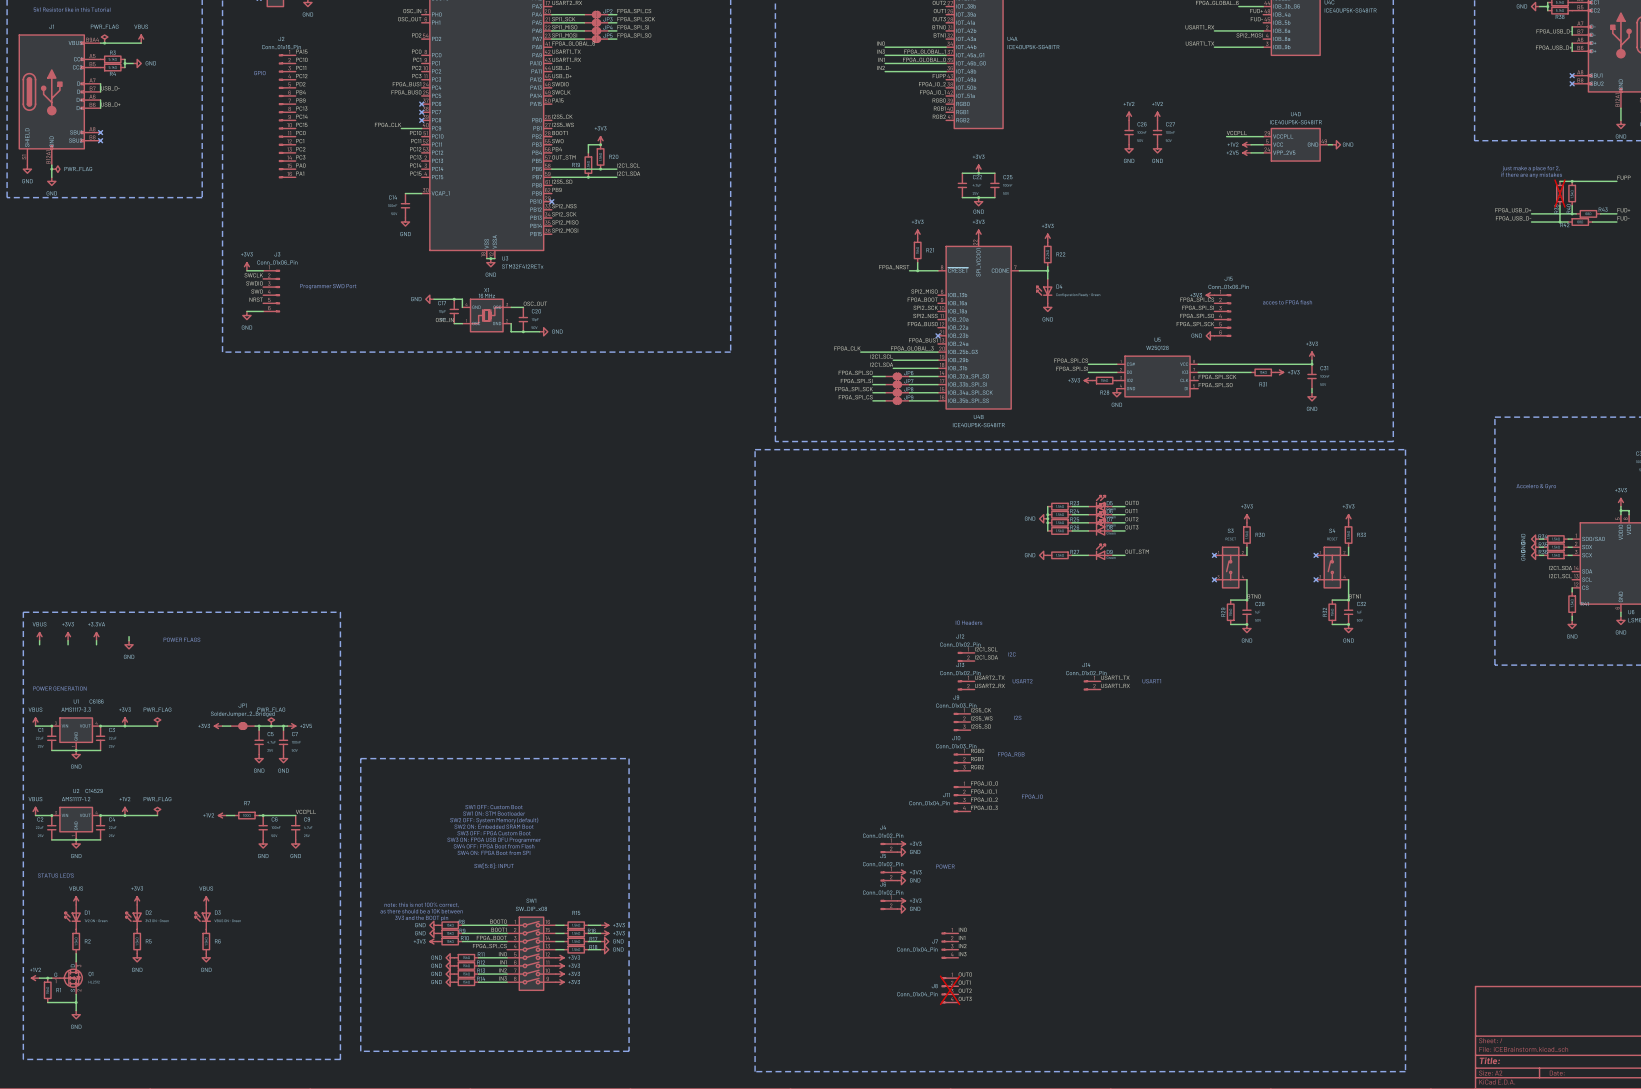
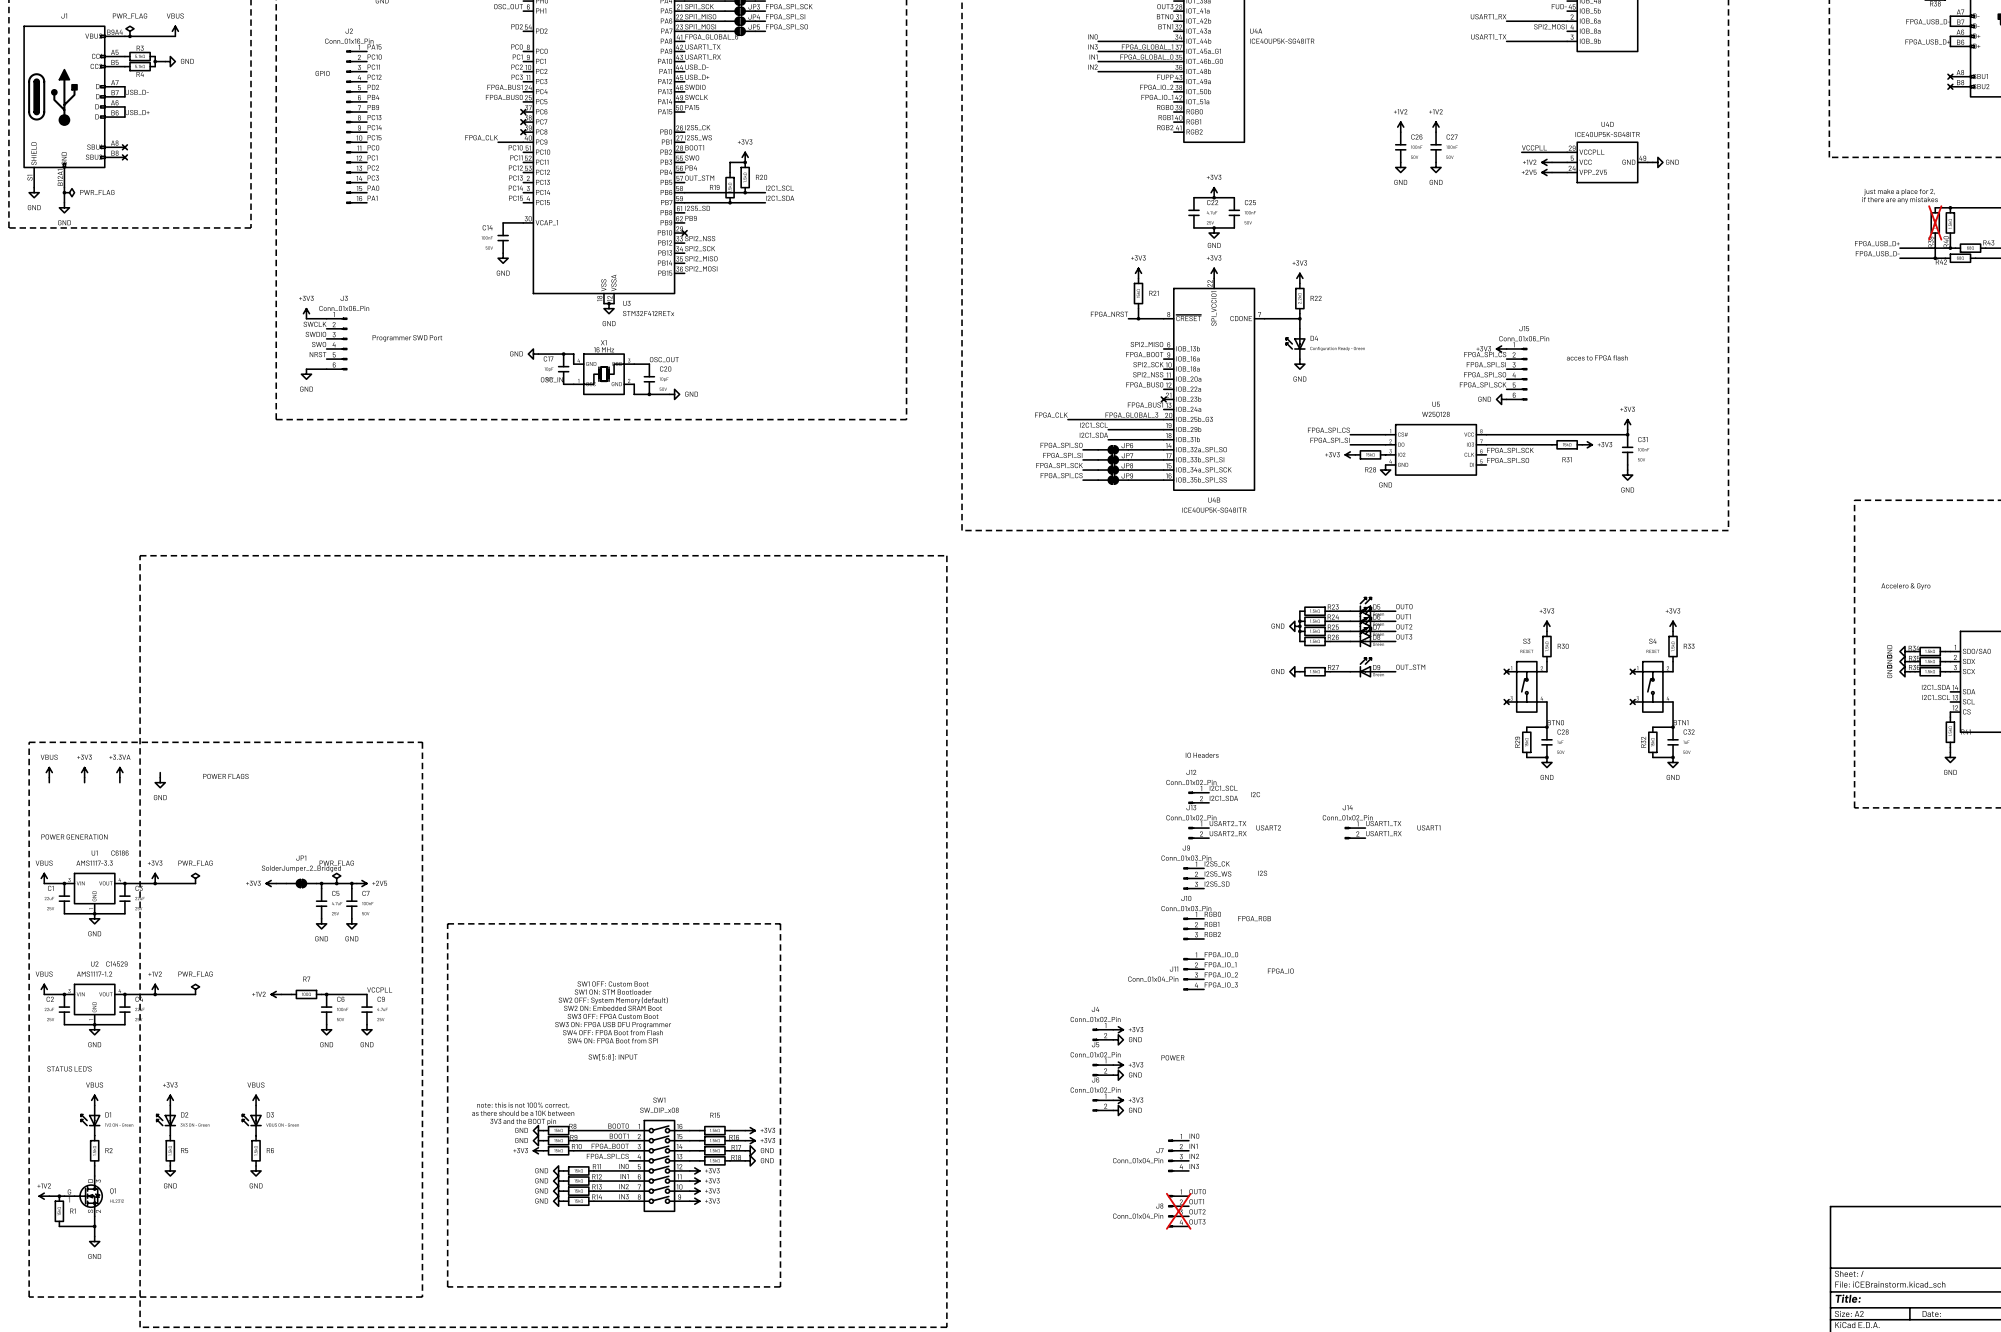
line: (755, 449) (1405, 449) (1405, 1071) (755, 1071) (755, 449) -> none
line: none -> (140, 555) (946, 555) (946, 1327) (140, 1327) (140, 555)

